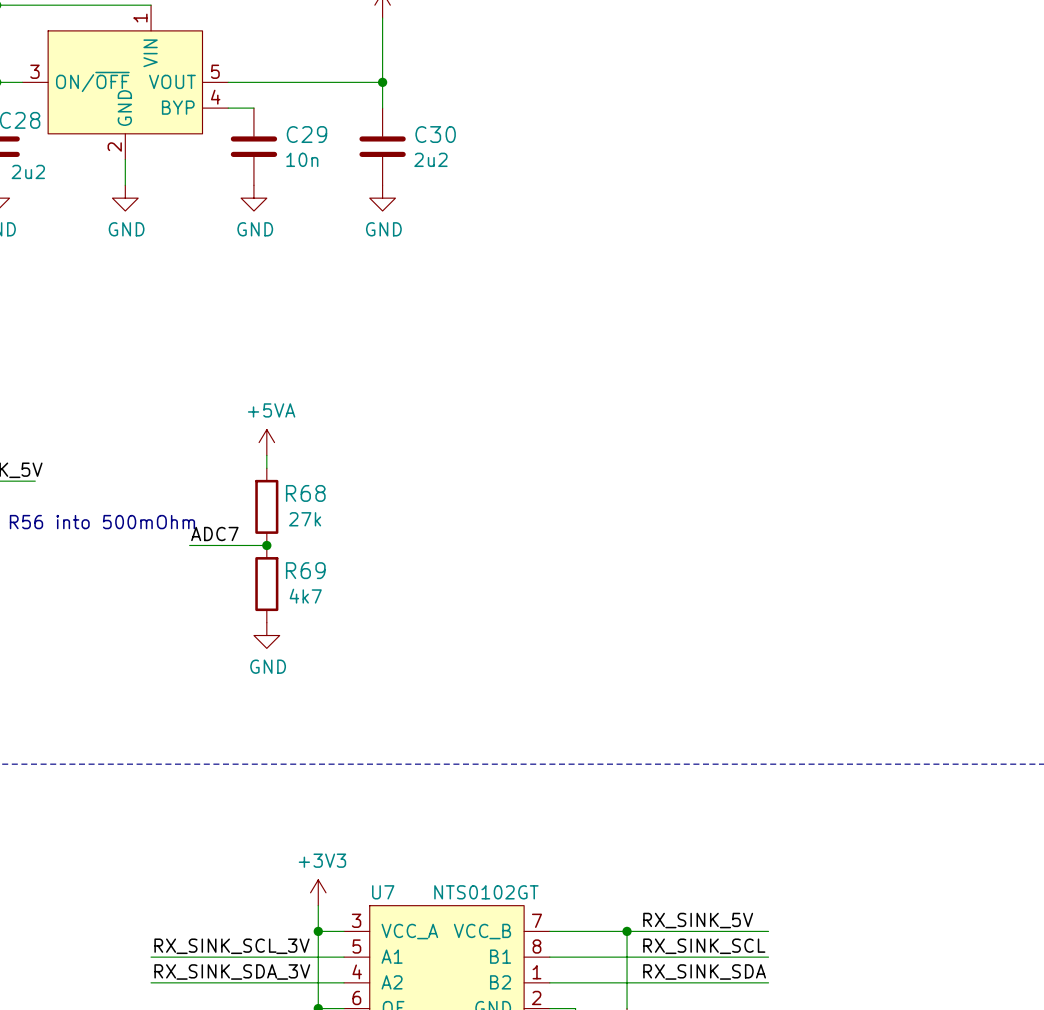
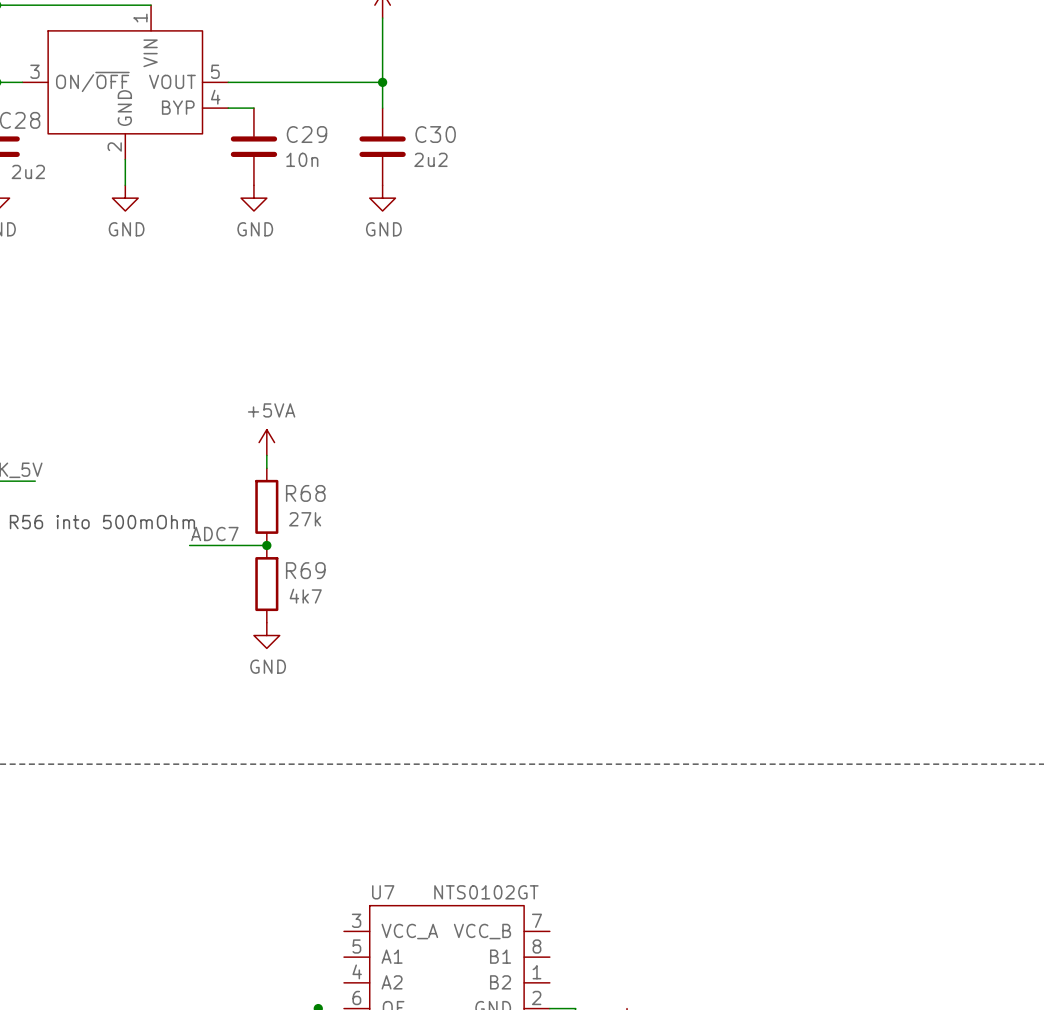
power symbol: +3V3 (318, 892) -> none
wire: (318, 905) (318, 1008) (344, 1008) -> none
label: RX_SINK_5V (698, 920) -> none
wire: (318, 931) (344, 931) -> none
junction: (318, 931) -> none
wire: (549, 931) (768, 931) -> none
wire: (627, 931) (627, 1008) -> none
junction: (627, 931) -> none
label: RX_SINK_SCL_3V (232, 946) -> none
label: RX_SINK_SCL (704, 946) -> none
wire: (151, 957) (344, 957) -> none
wire: (549, 957) (768, 957) -> none
label: RX_SINK_SDA_3V (232, 971) -> none
label: RX_SINK_SDA (704, 971) -> none
wire: (151, 982) (344, 982) -> none
wire: (549, 982) (768, 982) -> none

